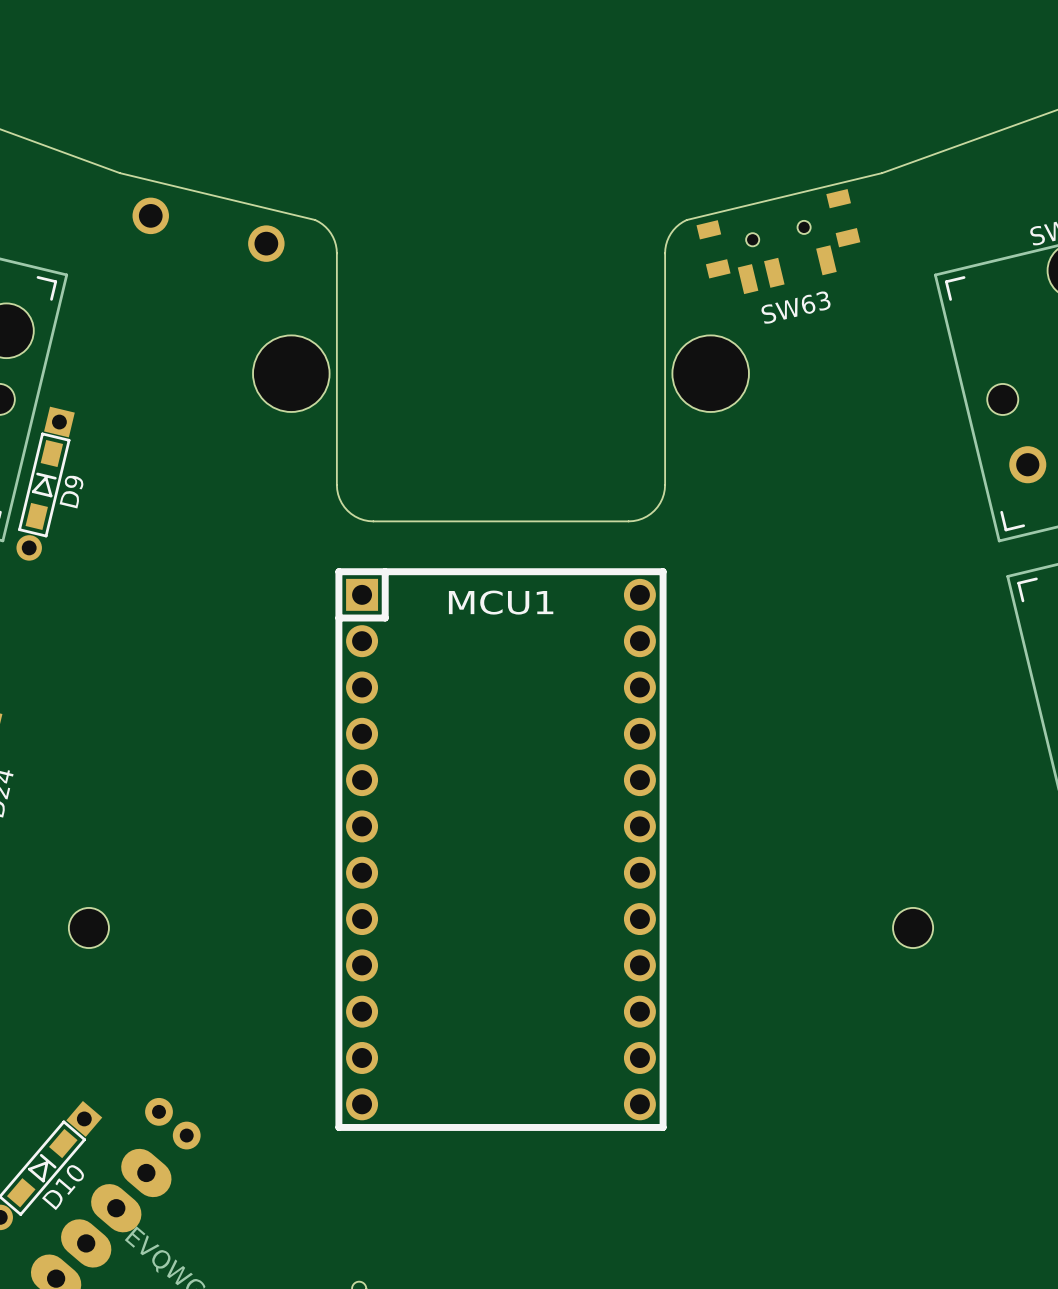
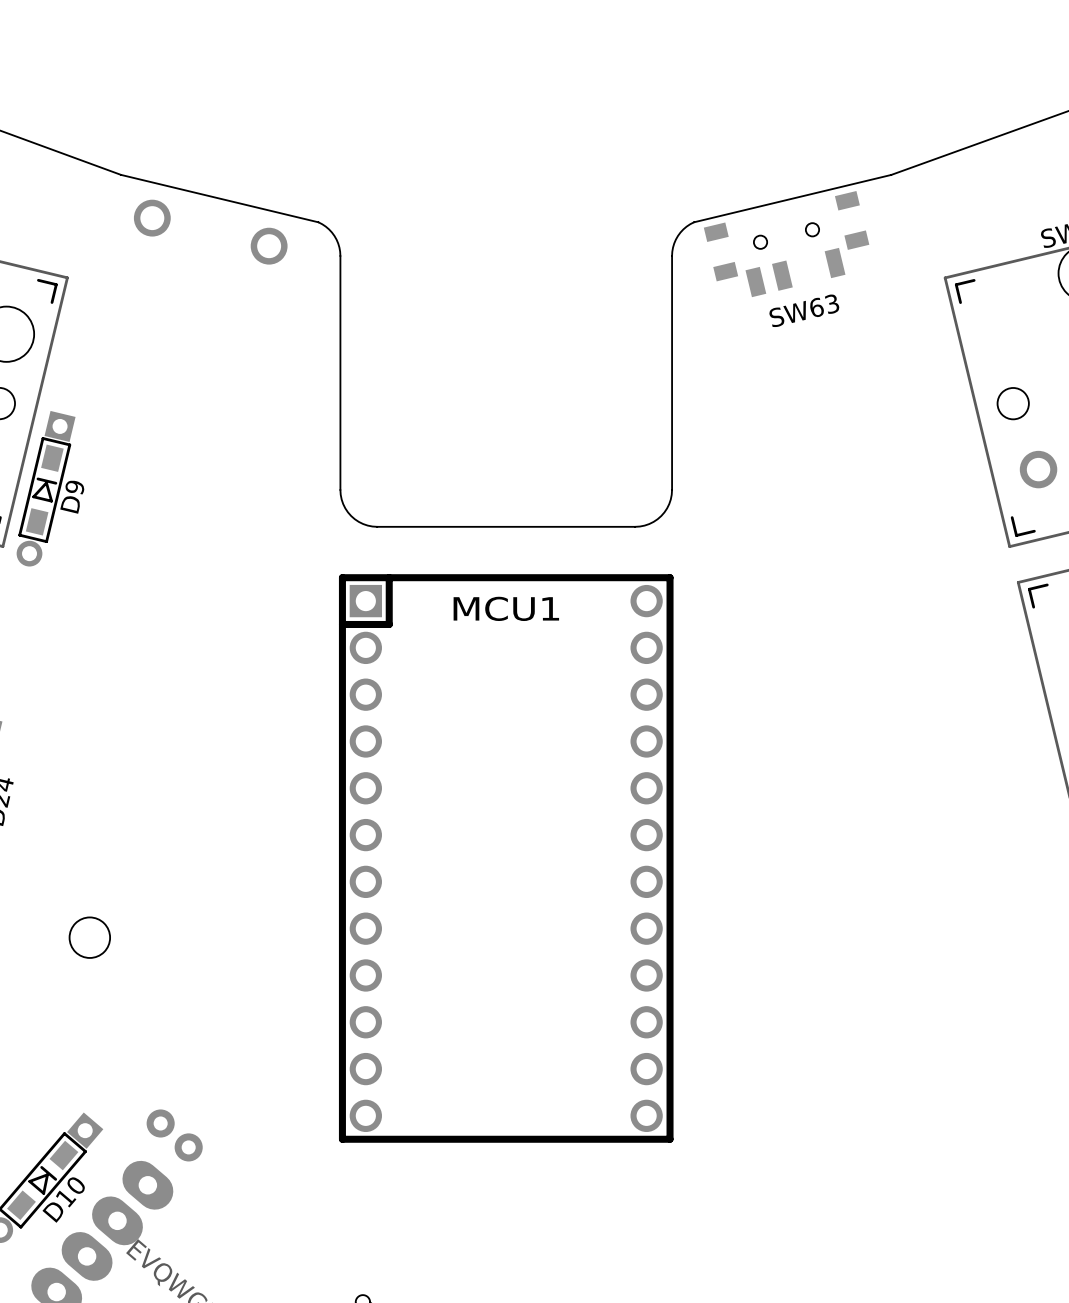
part: (291, 373) -> none
part: (710, 373) -> none
part: (913, 927) -> none

